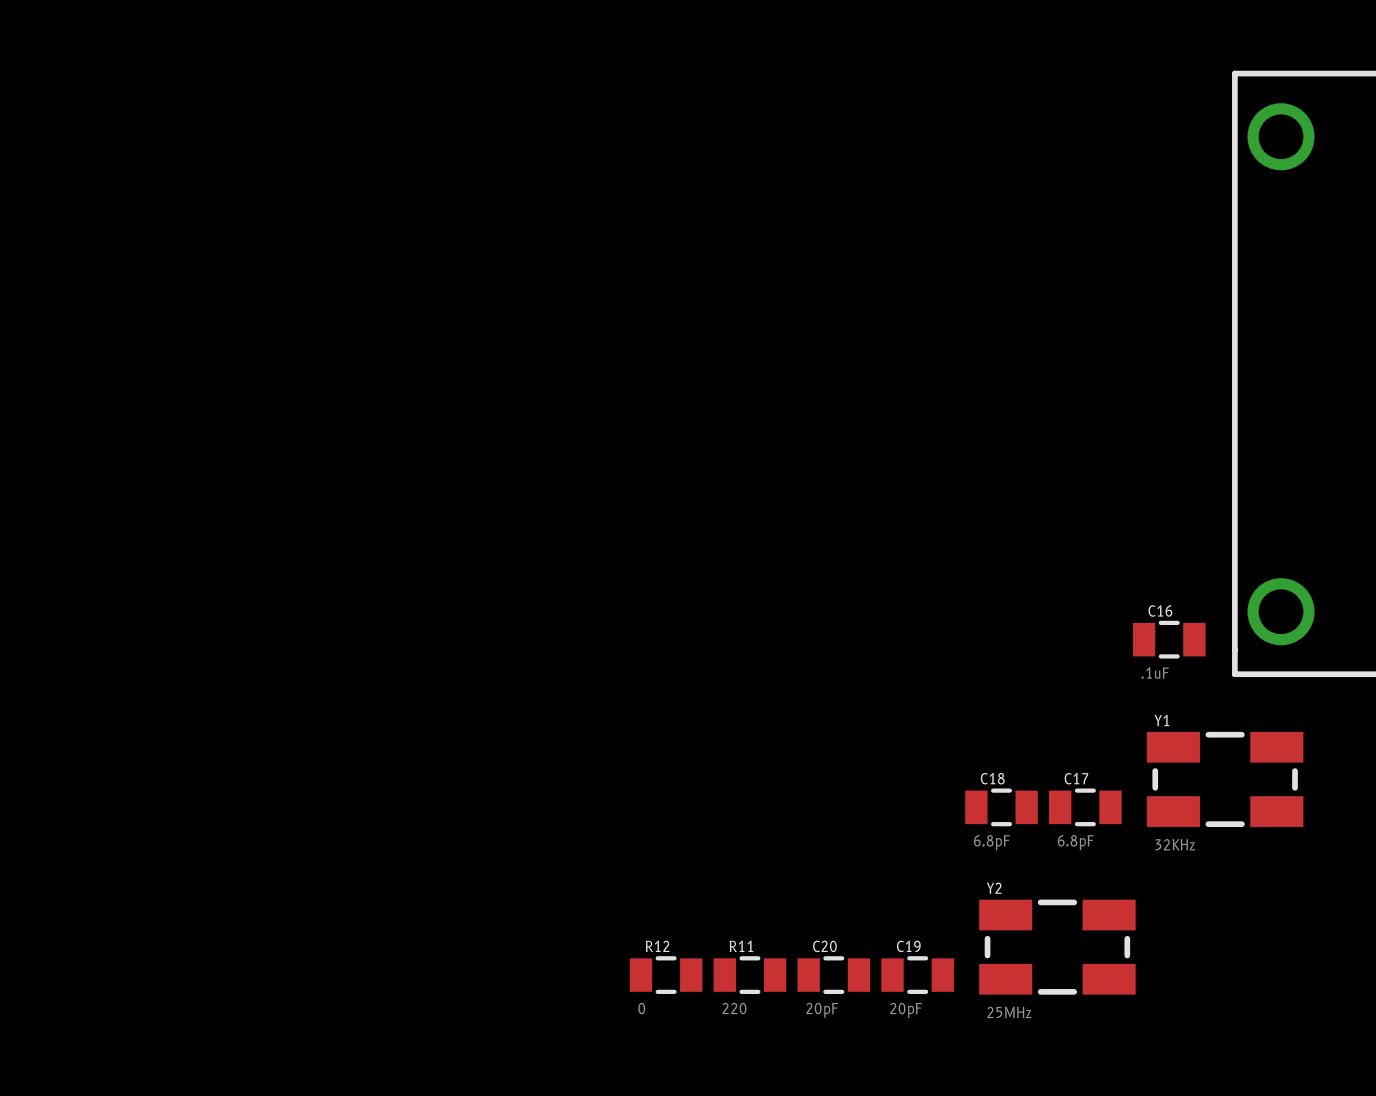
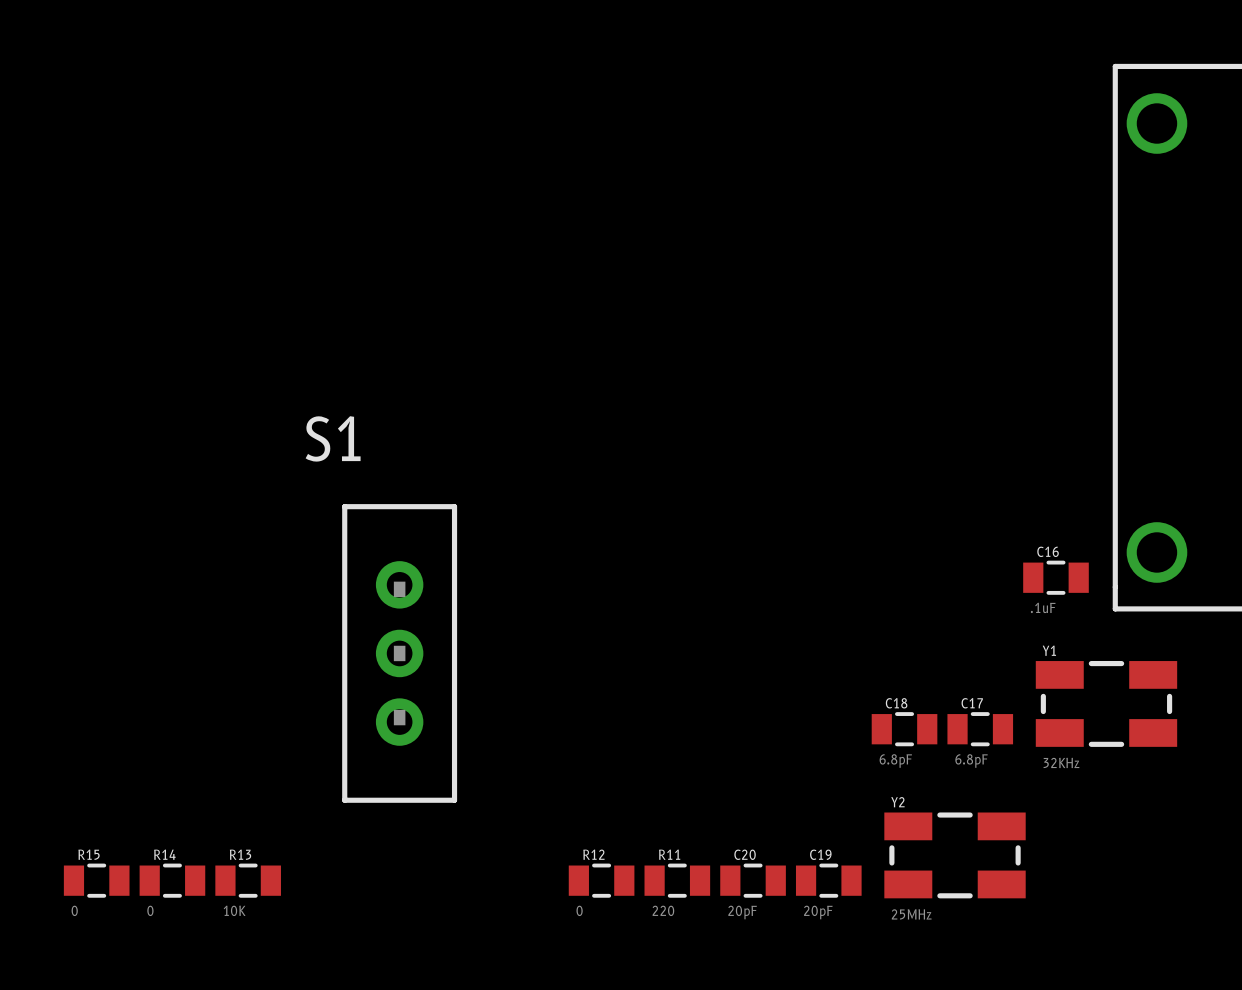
S1: none -> (399, 653)
R15: none -> 0 (96, 880)
R14: none -> 0 (172, 880)
R13: none -> 10K (248, 880)

